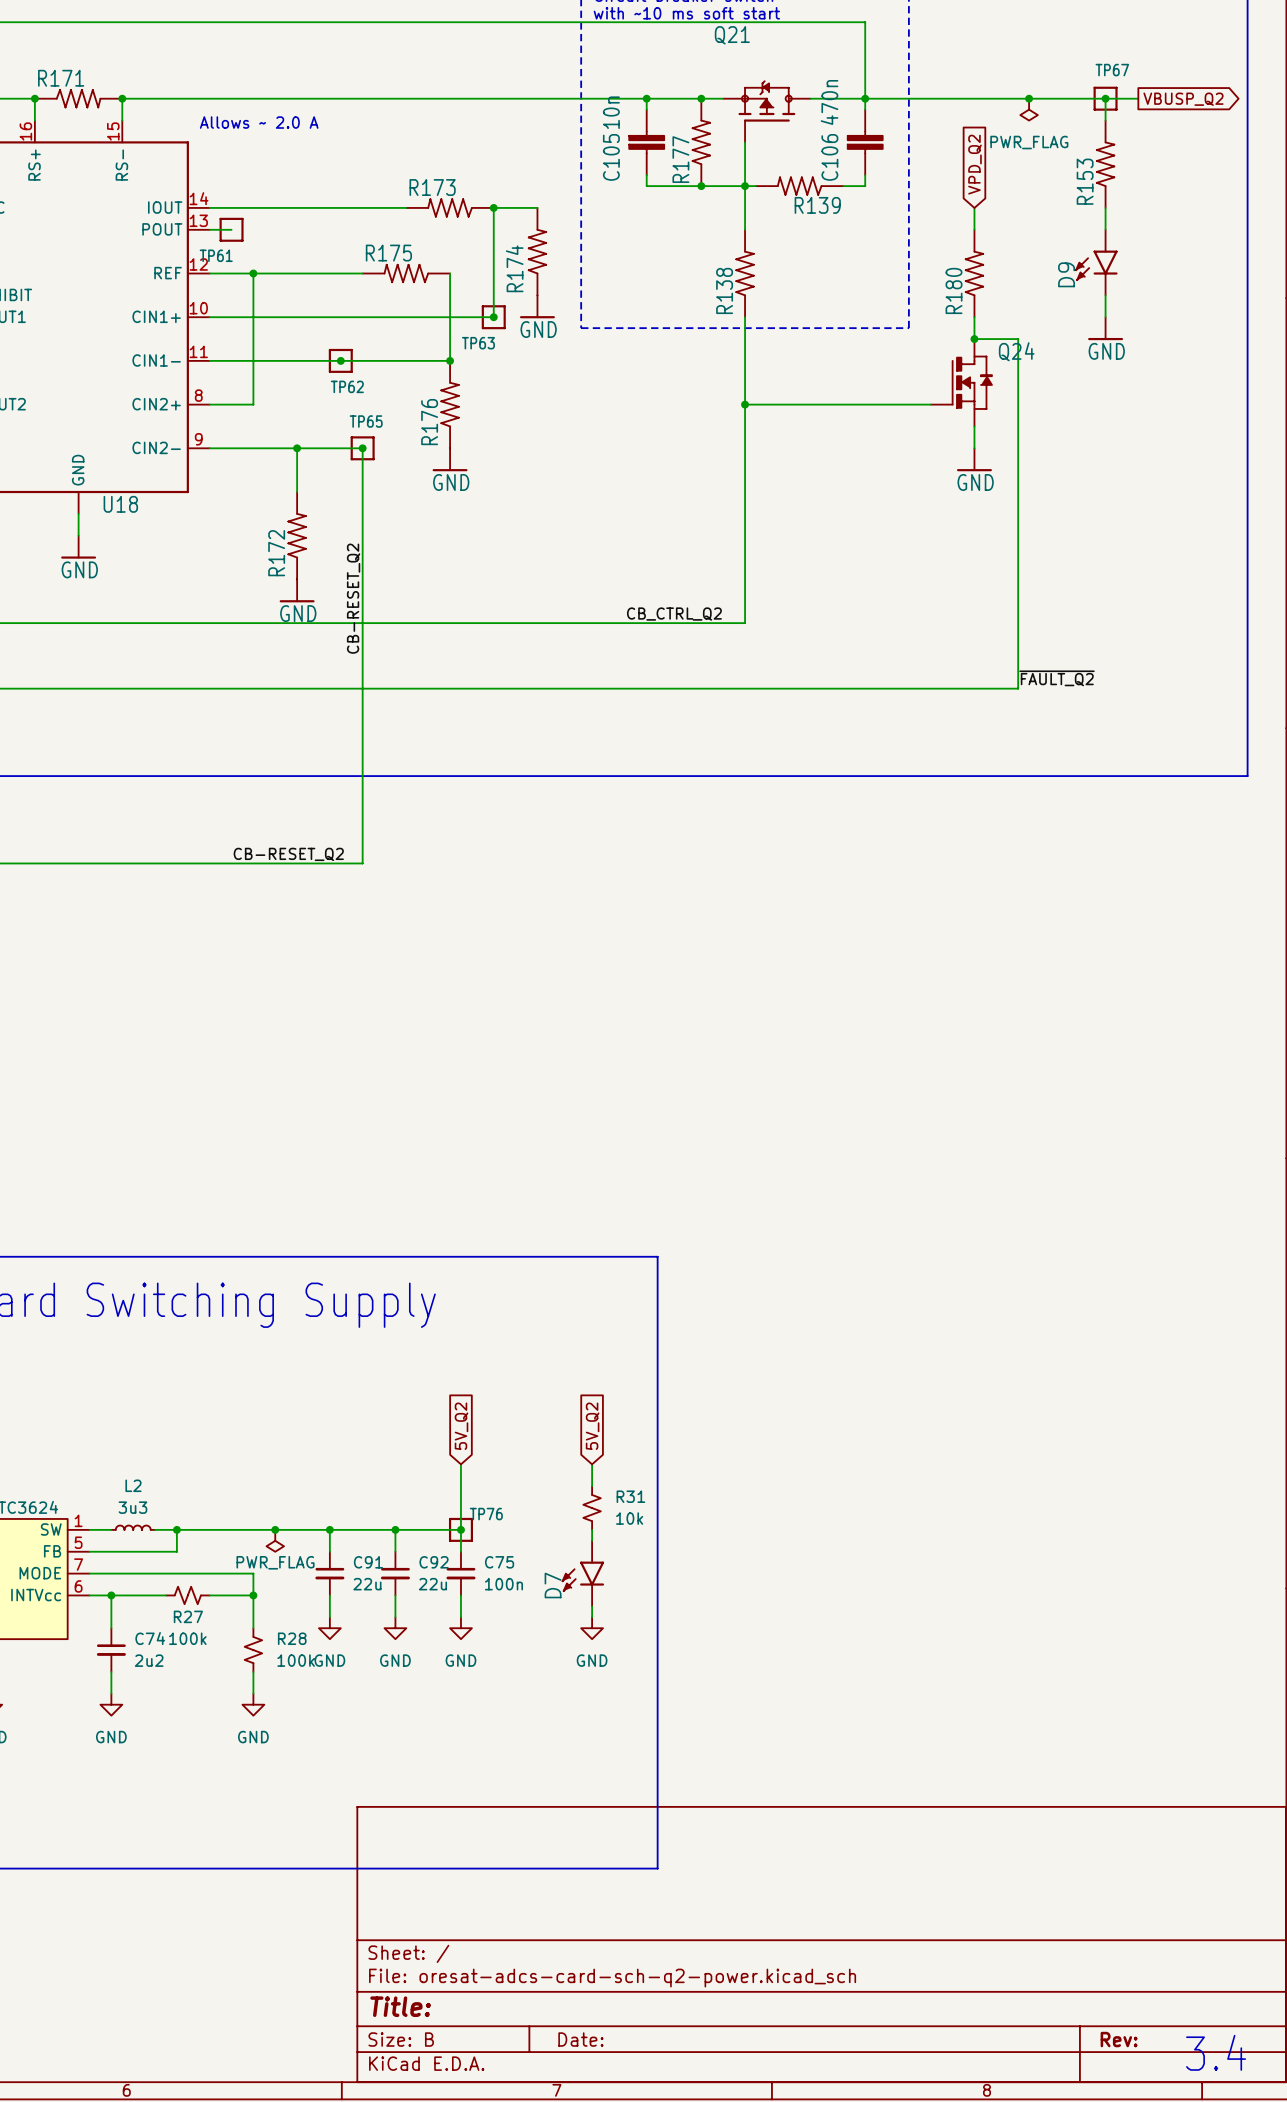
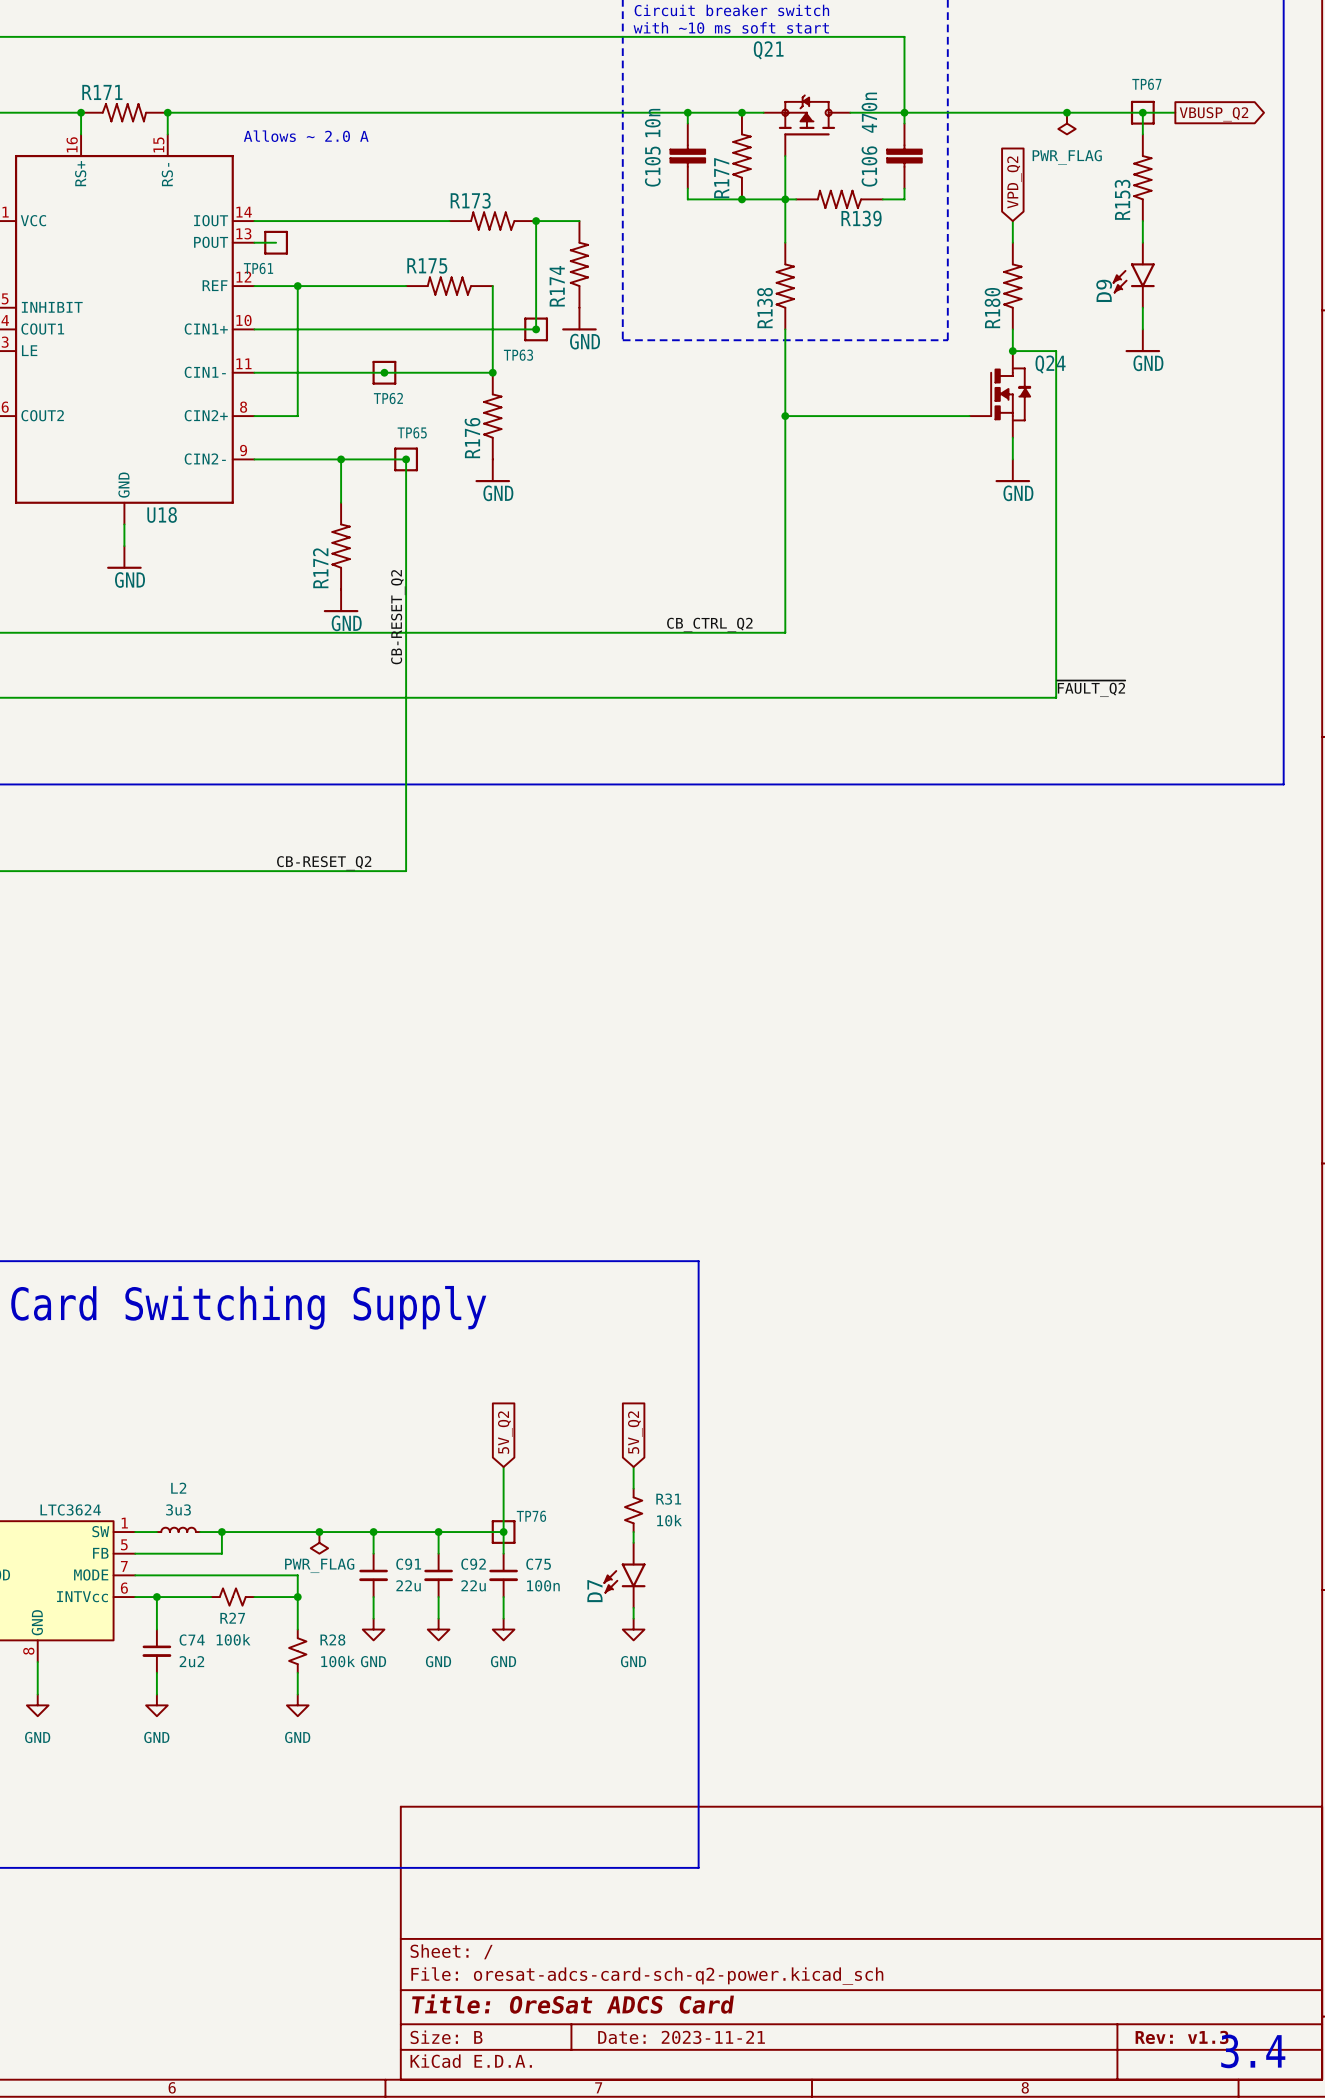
title block: Title: (400, 2006) -> Title: OreSat ADCS Card (573, 2004)
title block: Date: (580, 2039) -> Date: 2023-11-21 (681, 2037)
title block: Rev: (1119, 2039) -> Rev: v1.3 (1182, 2037)

